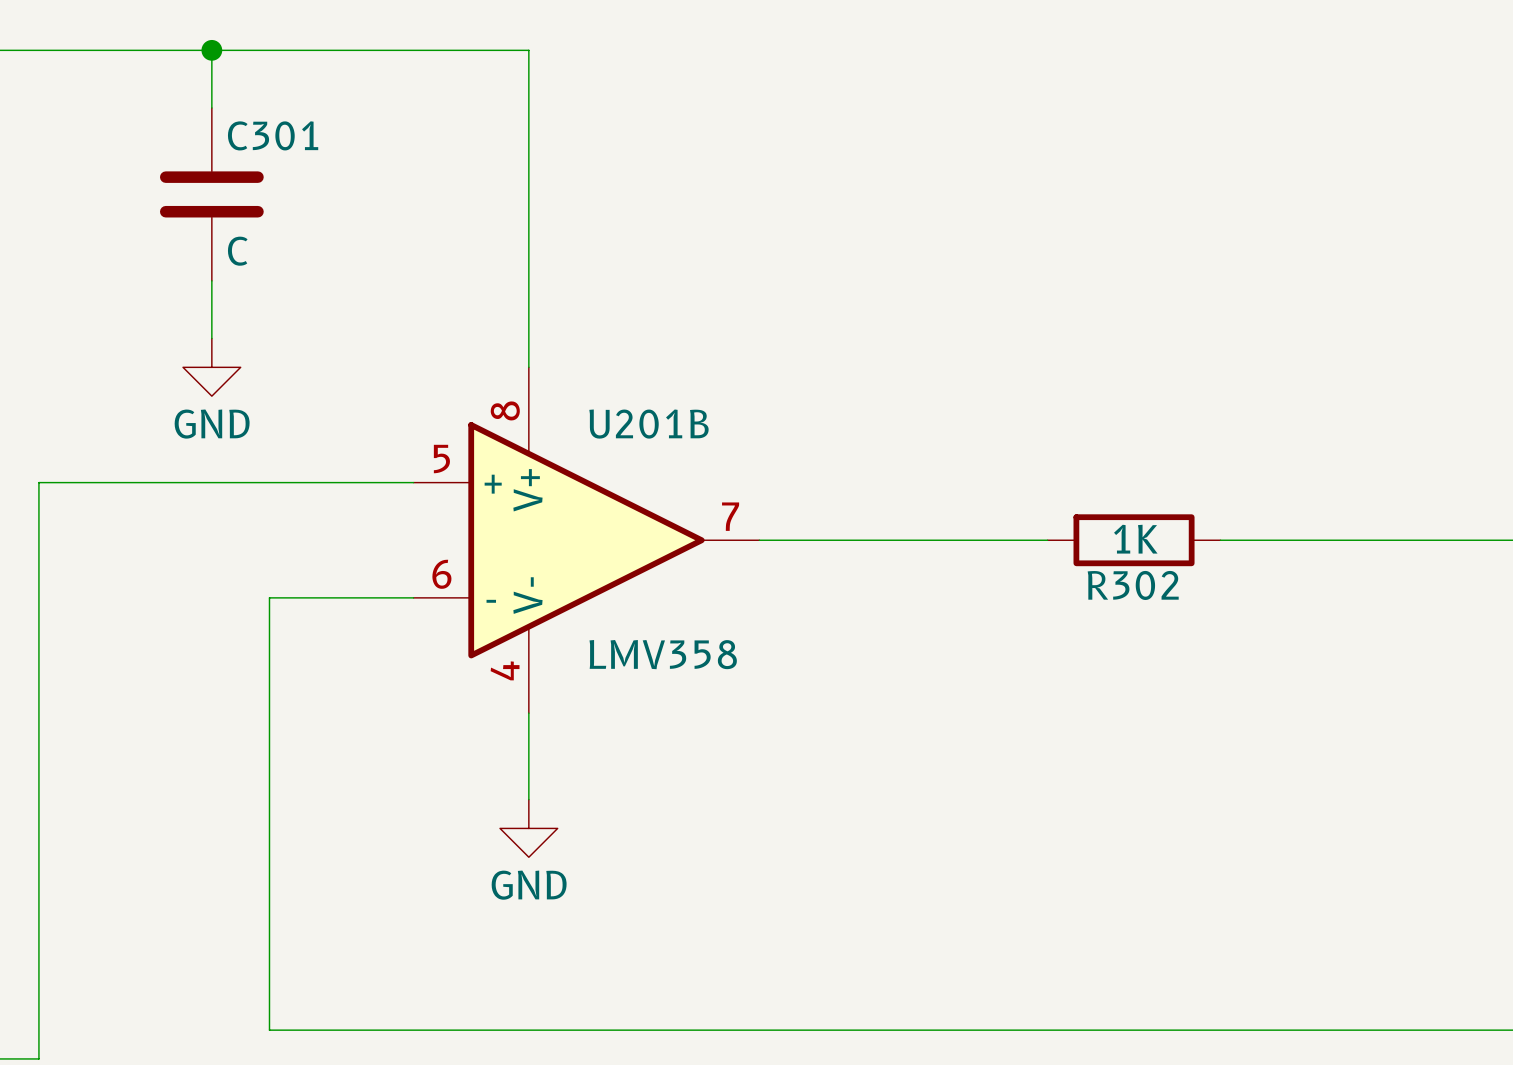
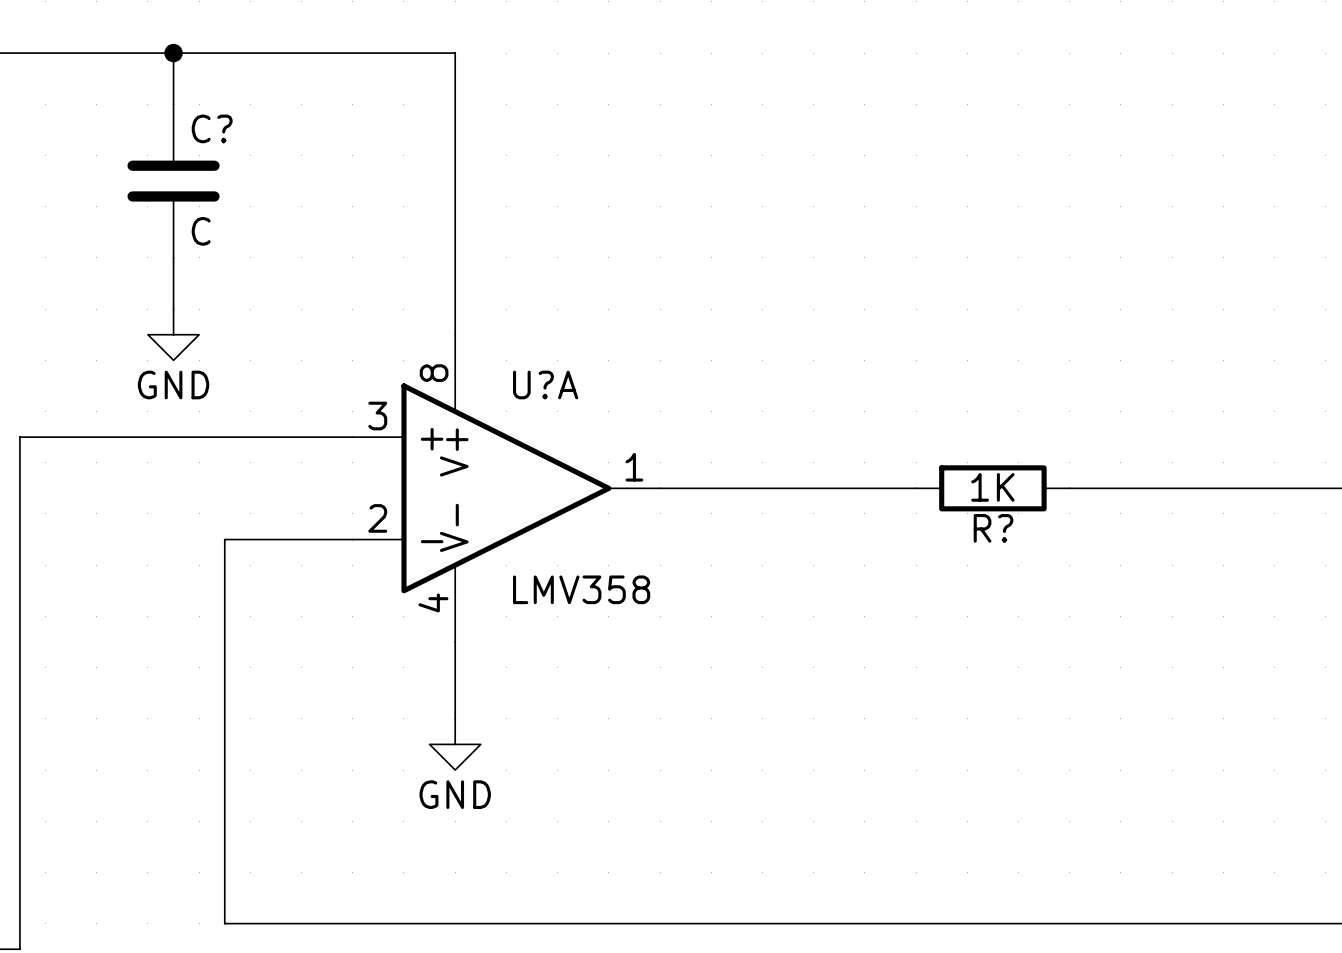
C301 name: C301 (273, 135) -> C? (212, 128)
U201B name: U201B (648, 424) -> U?A (545, 384)
U201B pin number: 5 (441, 459) -> 3 (377, 416)
U201B pin number: 7 (730, 516) -> 1 (634, 467)
U201B pin number: 6 (441, 574) -> 2 (377, 518)
R302 name: R302 (1133, 585) -> R? (993, 528)

